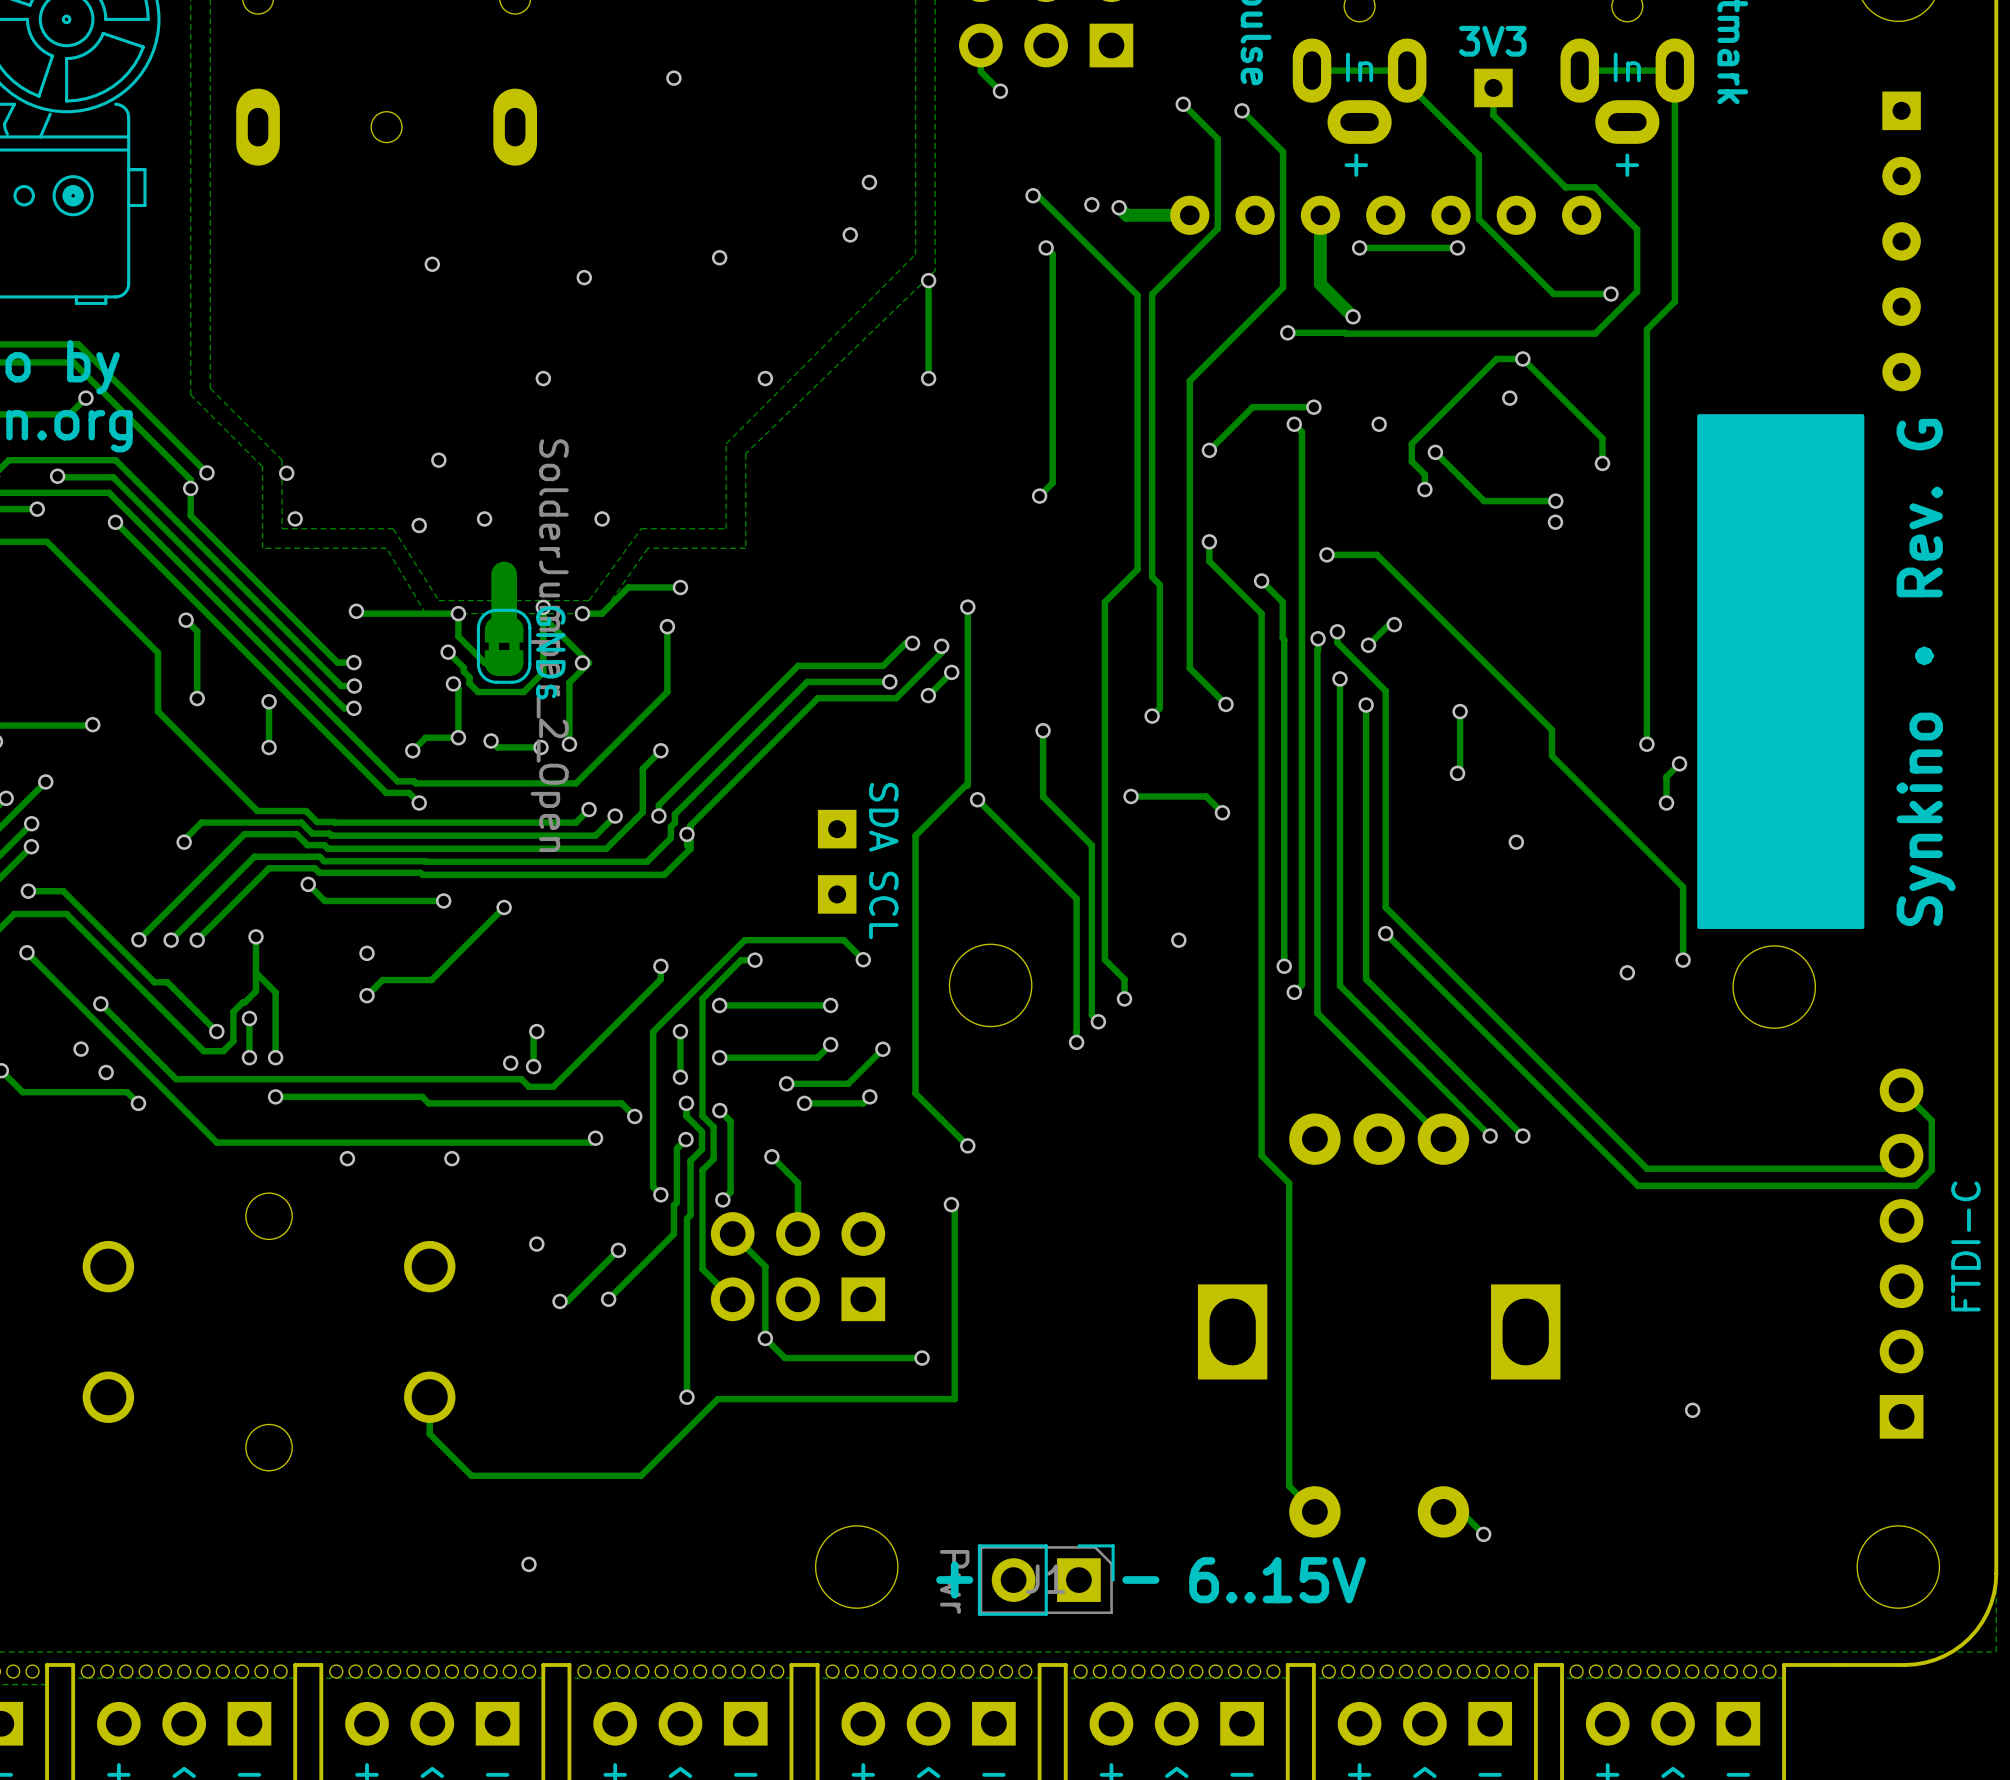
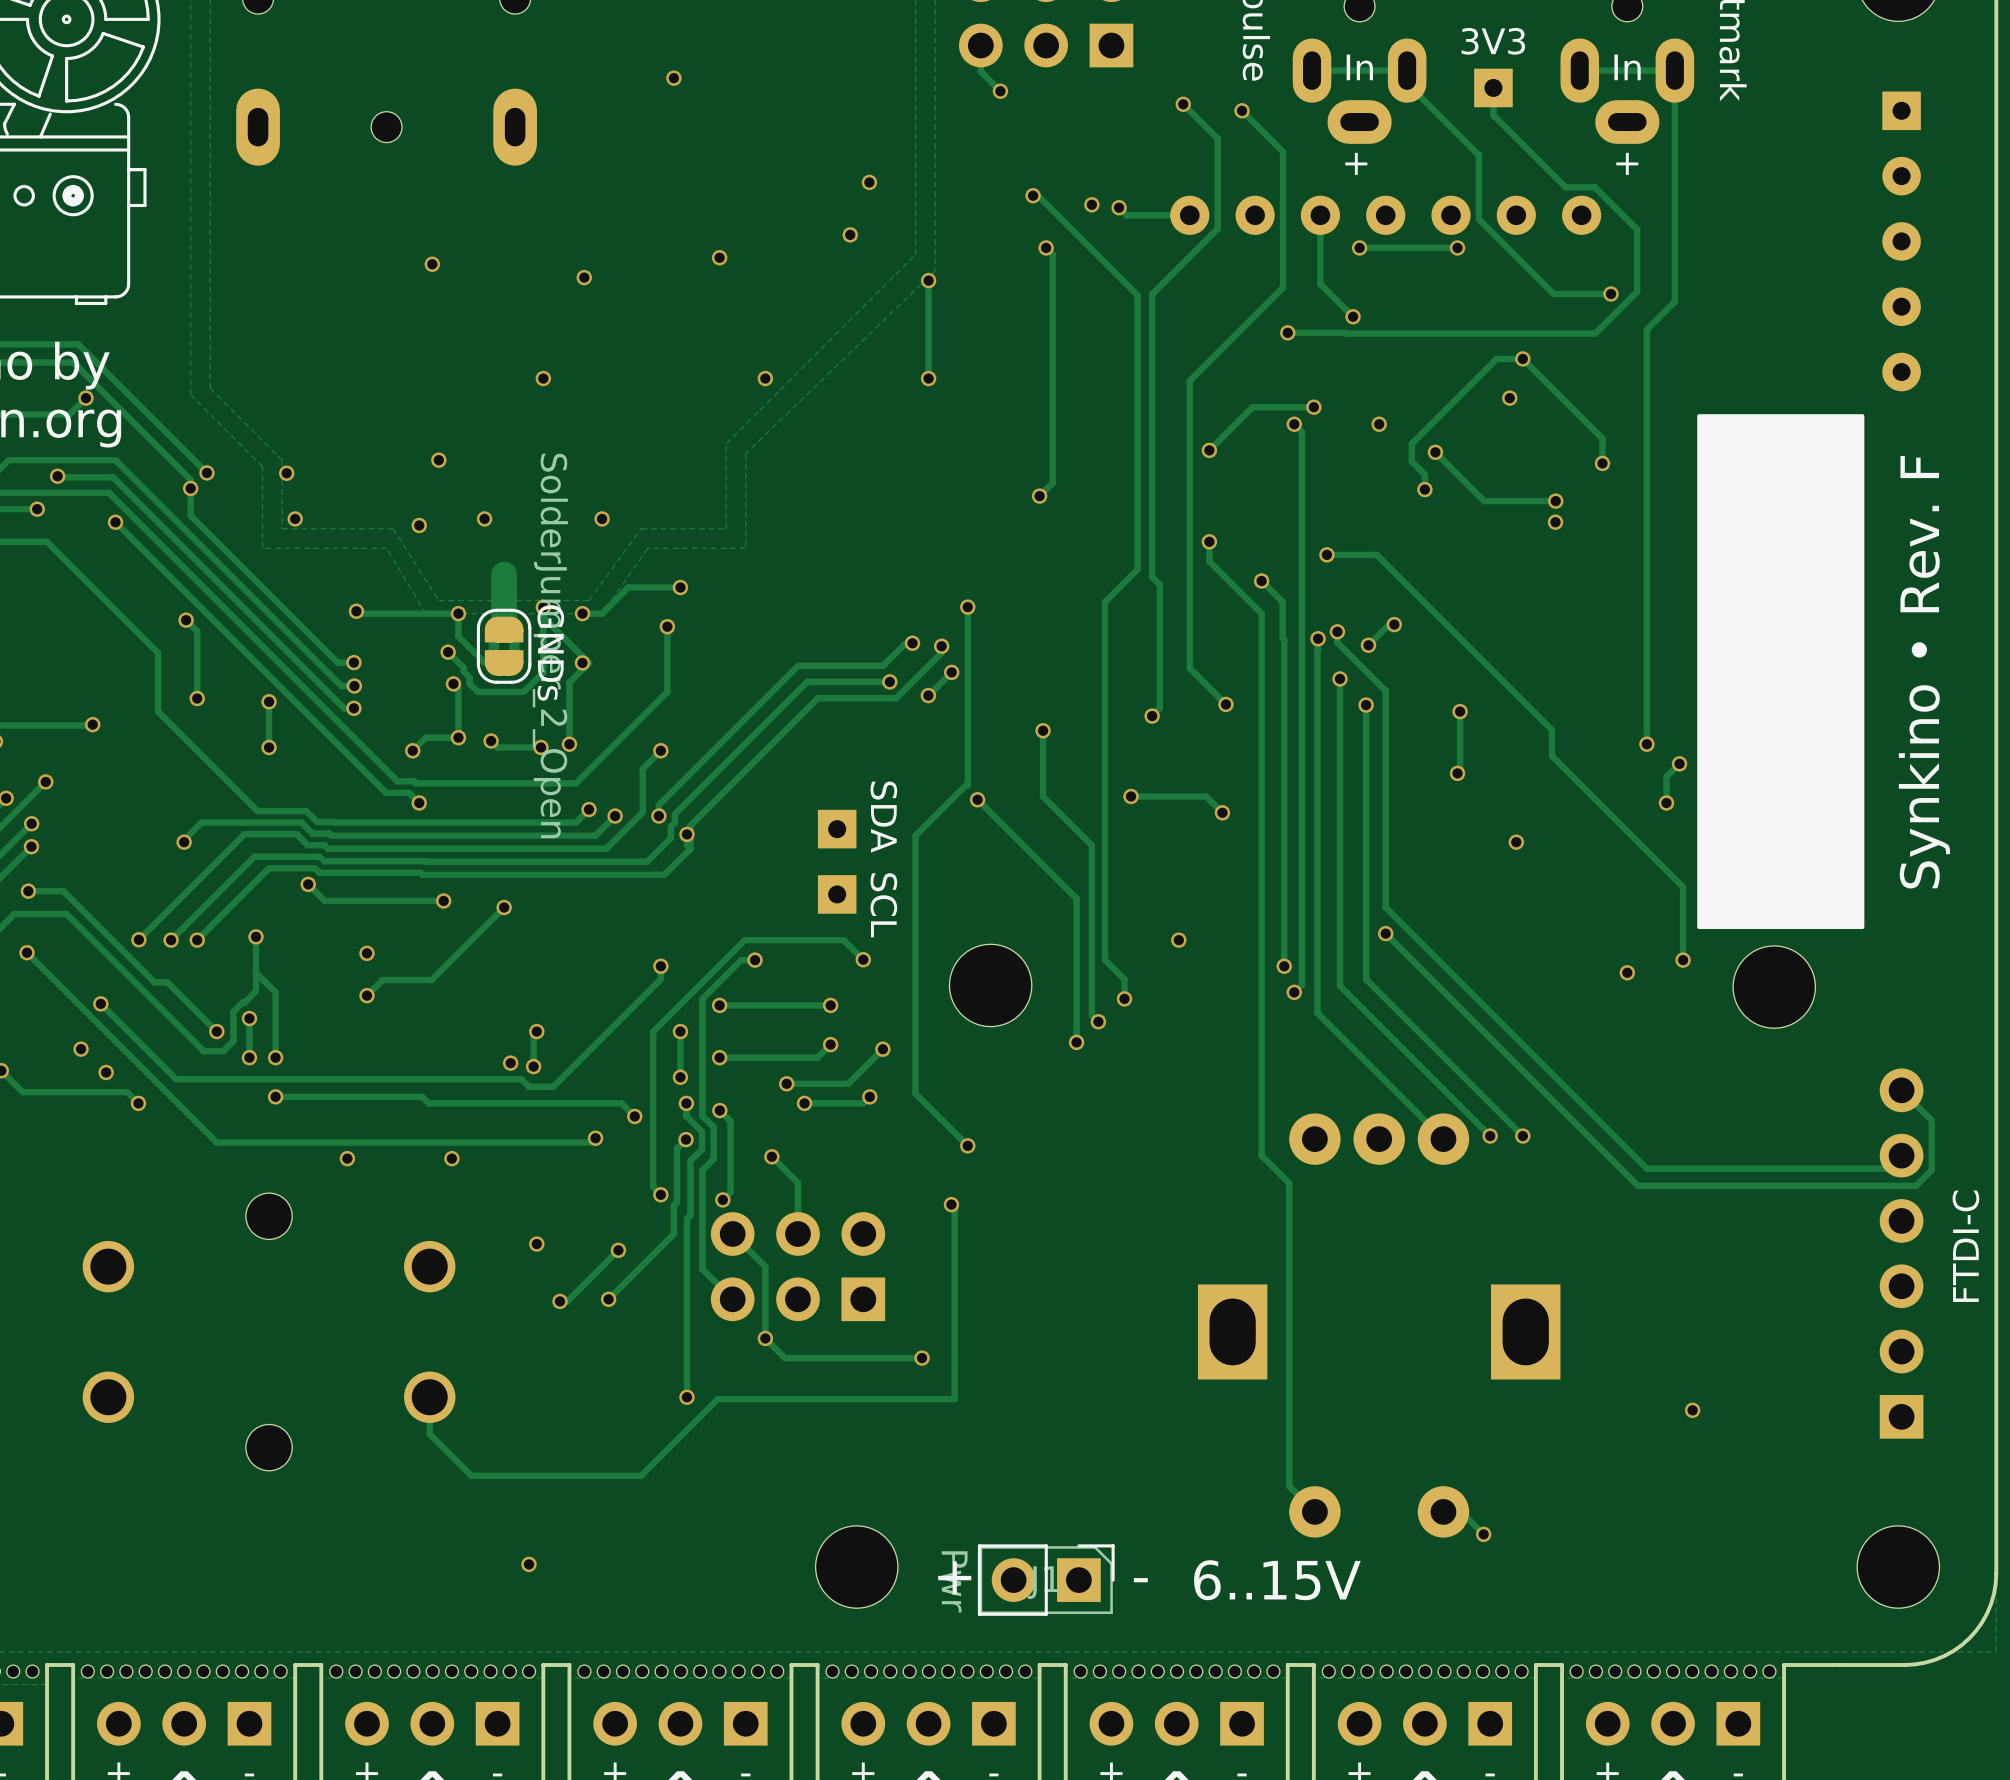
track width: thick (1119, 207) (1126, 215) (1189, 215) -> thin (1119, 207) (1126, 215) (1189, 215)
track width: thick (1320, 215) (1320, 284) (1353, 316) -> thin (1320, 215) (1320, 284) (1353, 316)
text: Synkino • Rev. G (1926, 672) -> Synkino • Rev. F (1924, 672)

